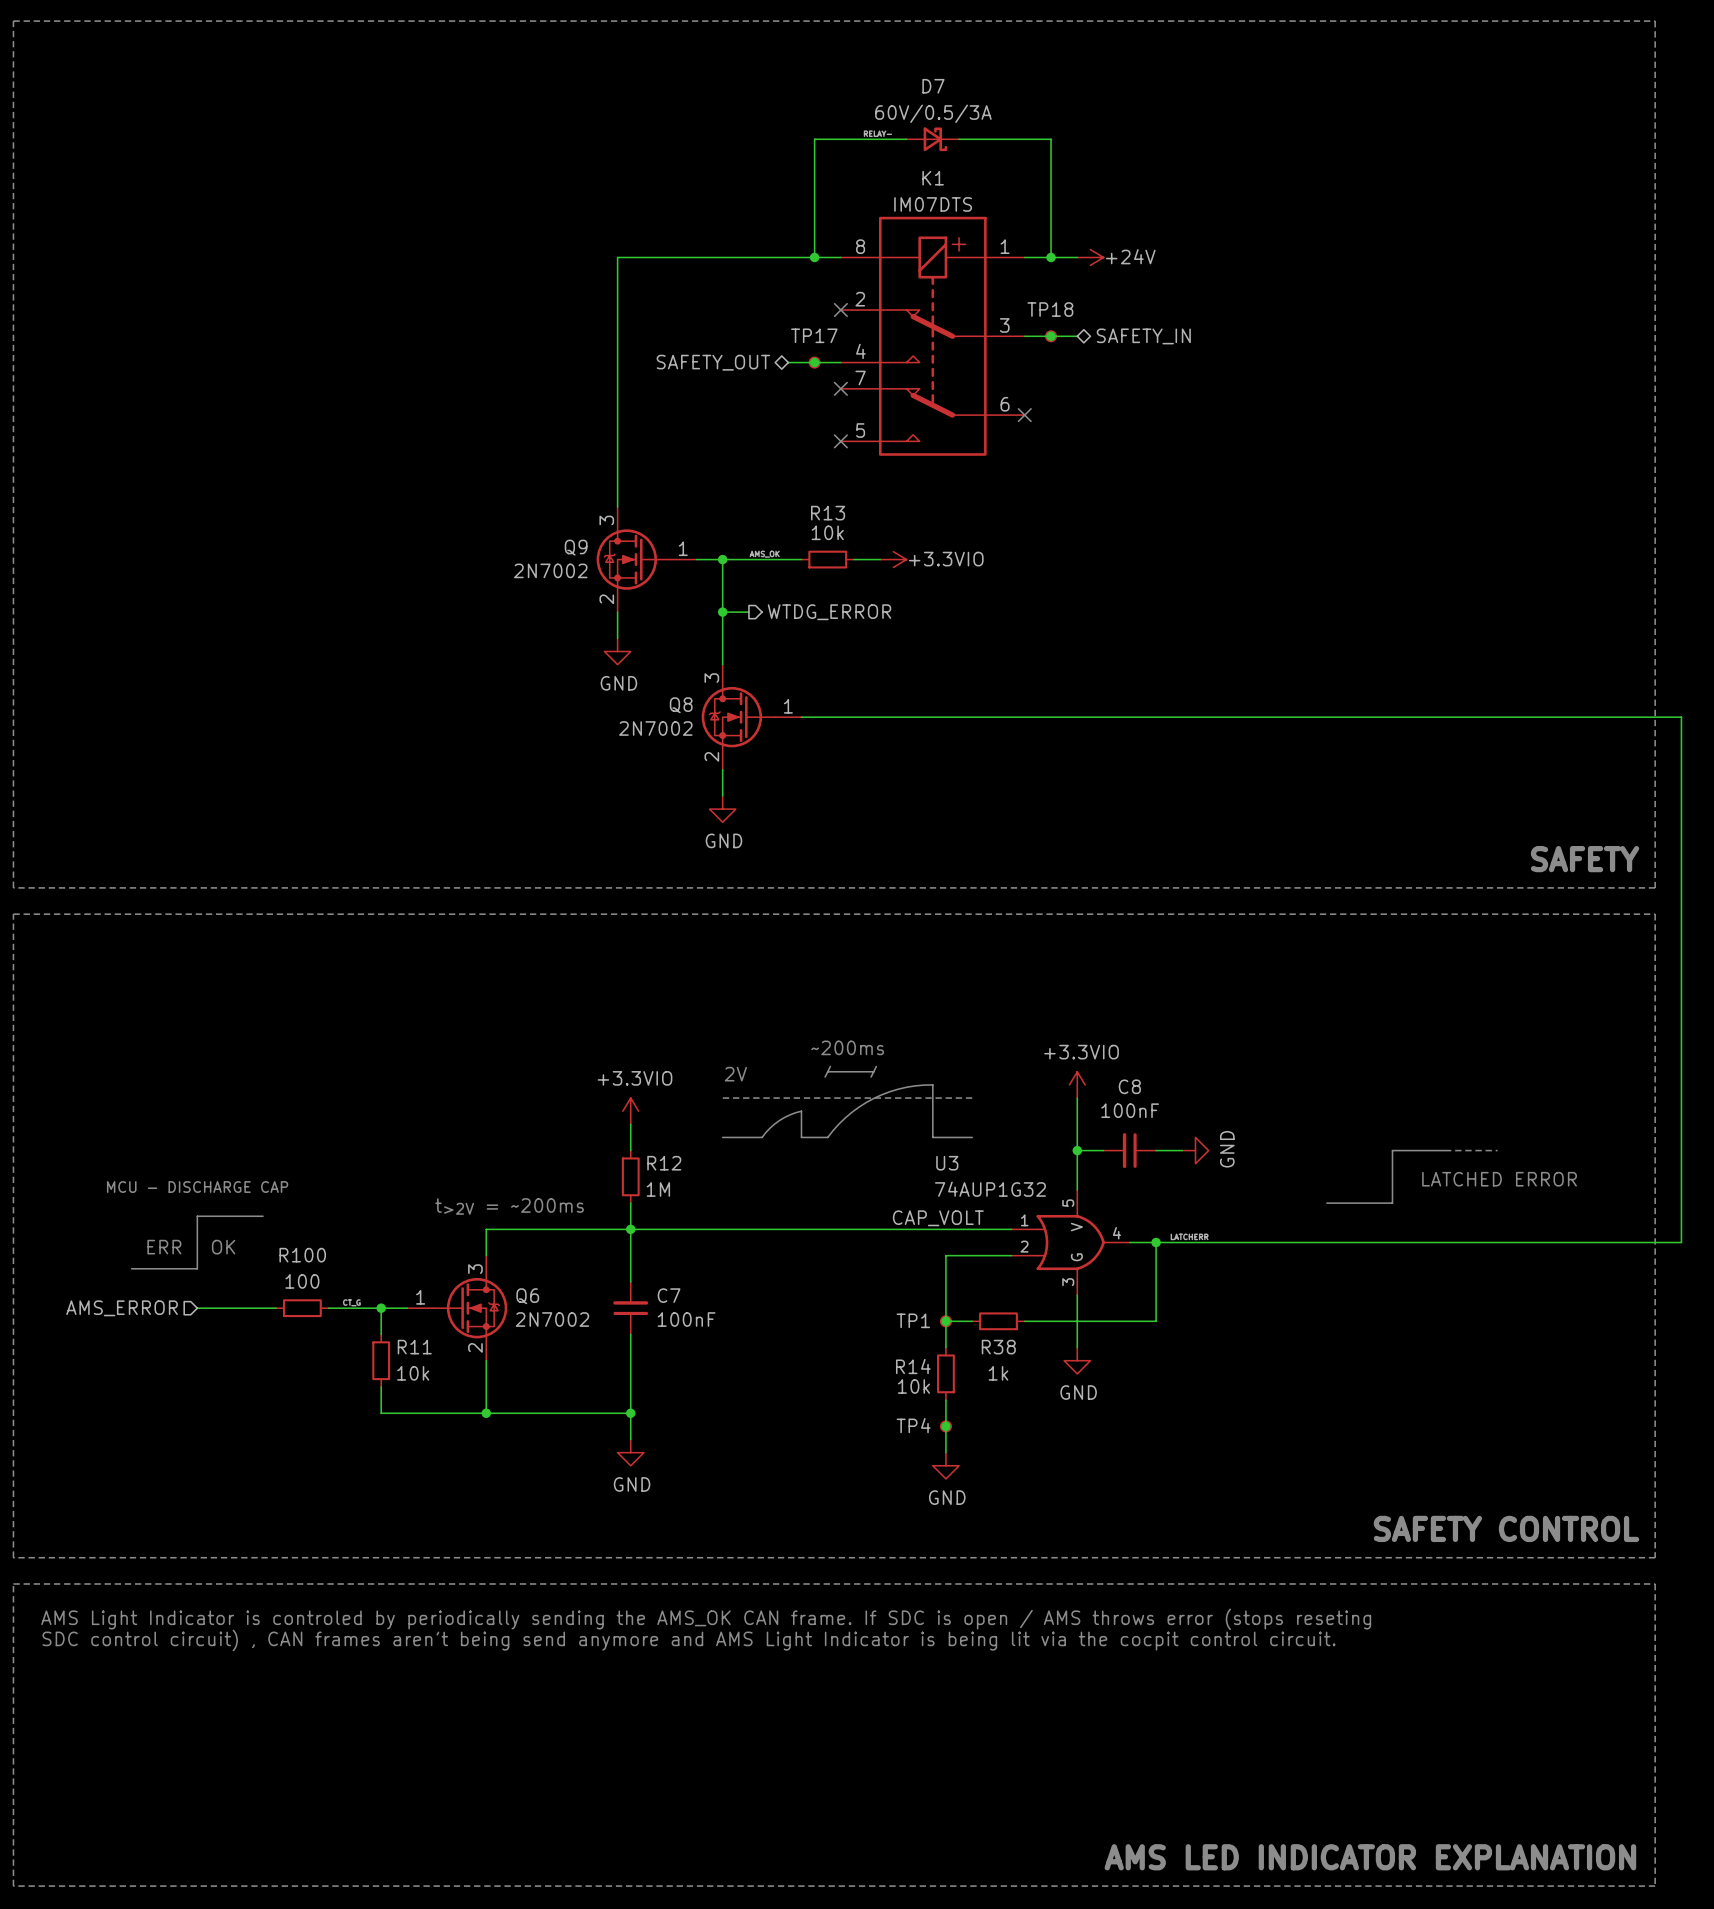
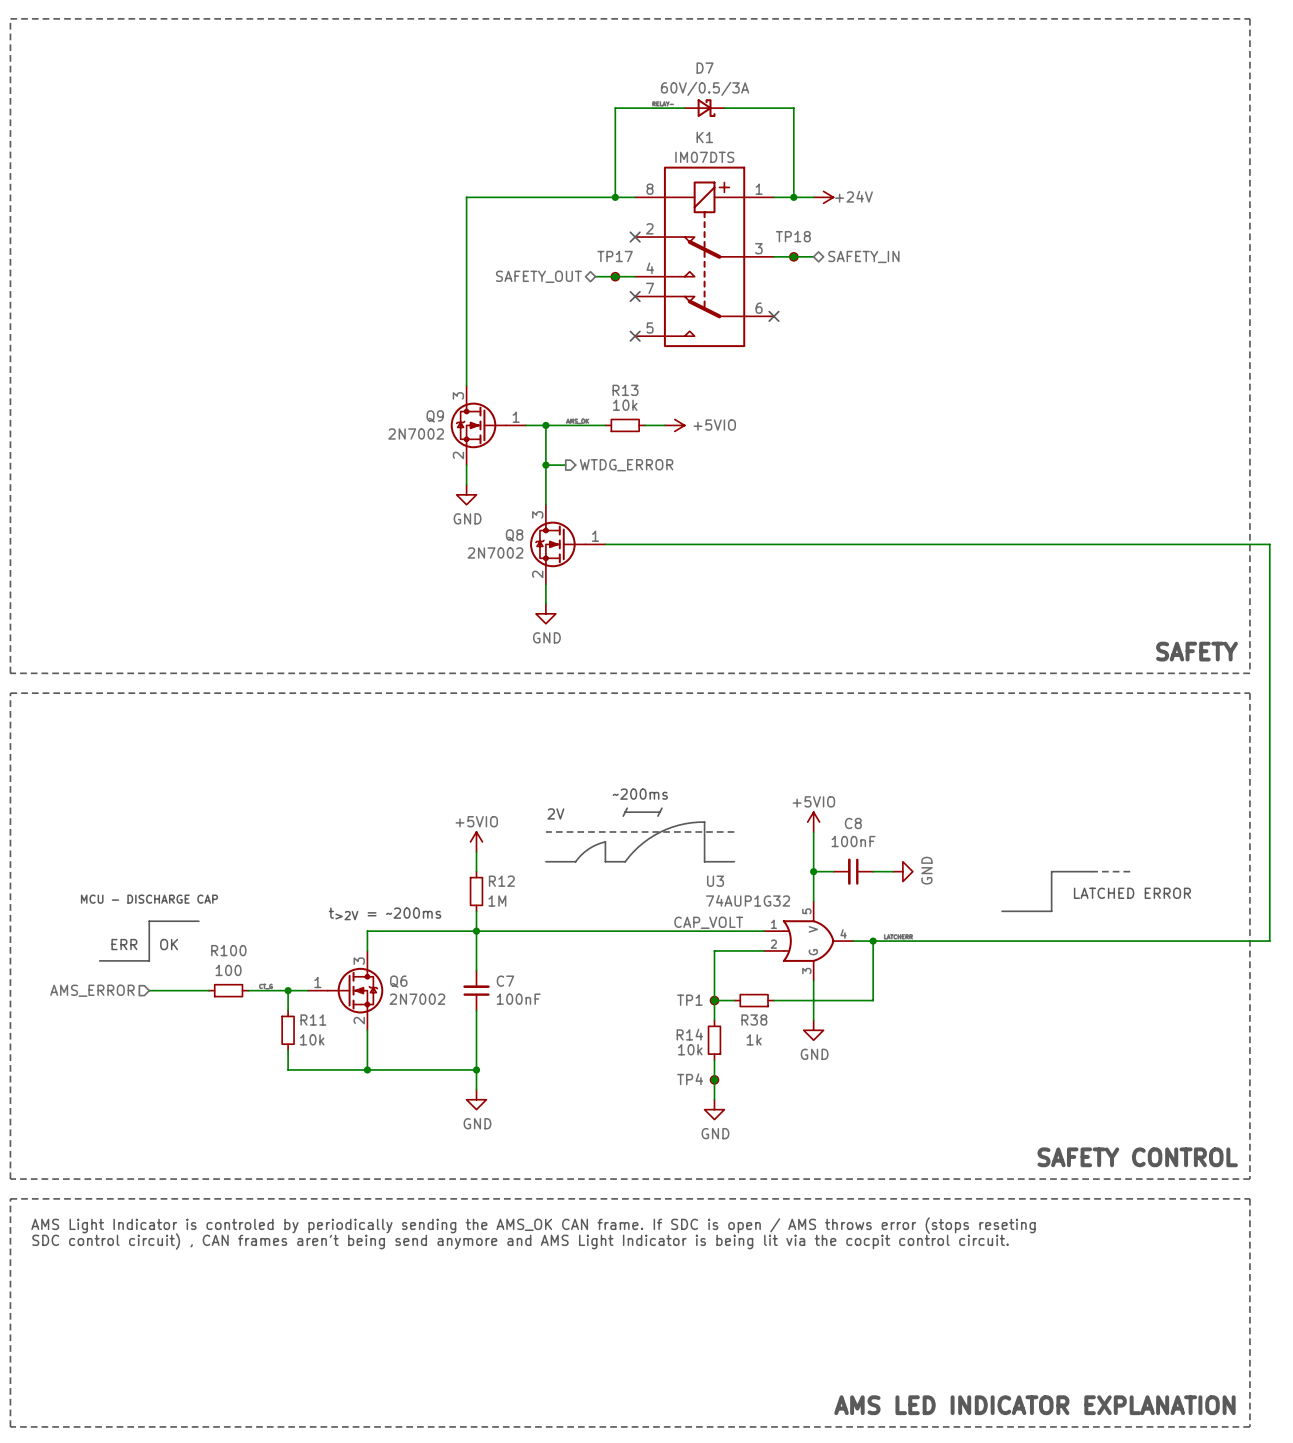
power symbol: +3.3VIO (893, 559) -> +5VIO (674, 425)
power symbol: +3.3VIO (1077, 1084) -> +5VIO (813, 822)
power symbol: +3.3VIO (630, 1111) -> +5VIO (476, 841)

